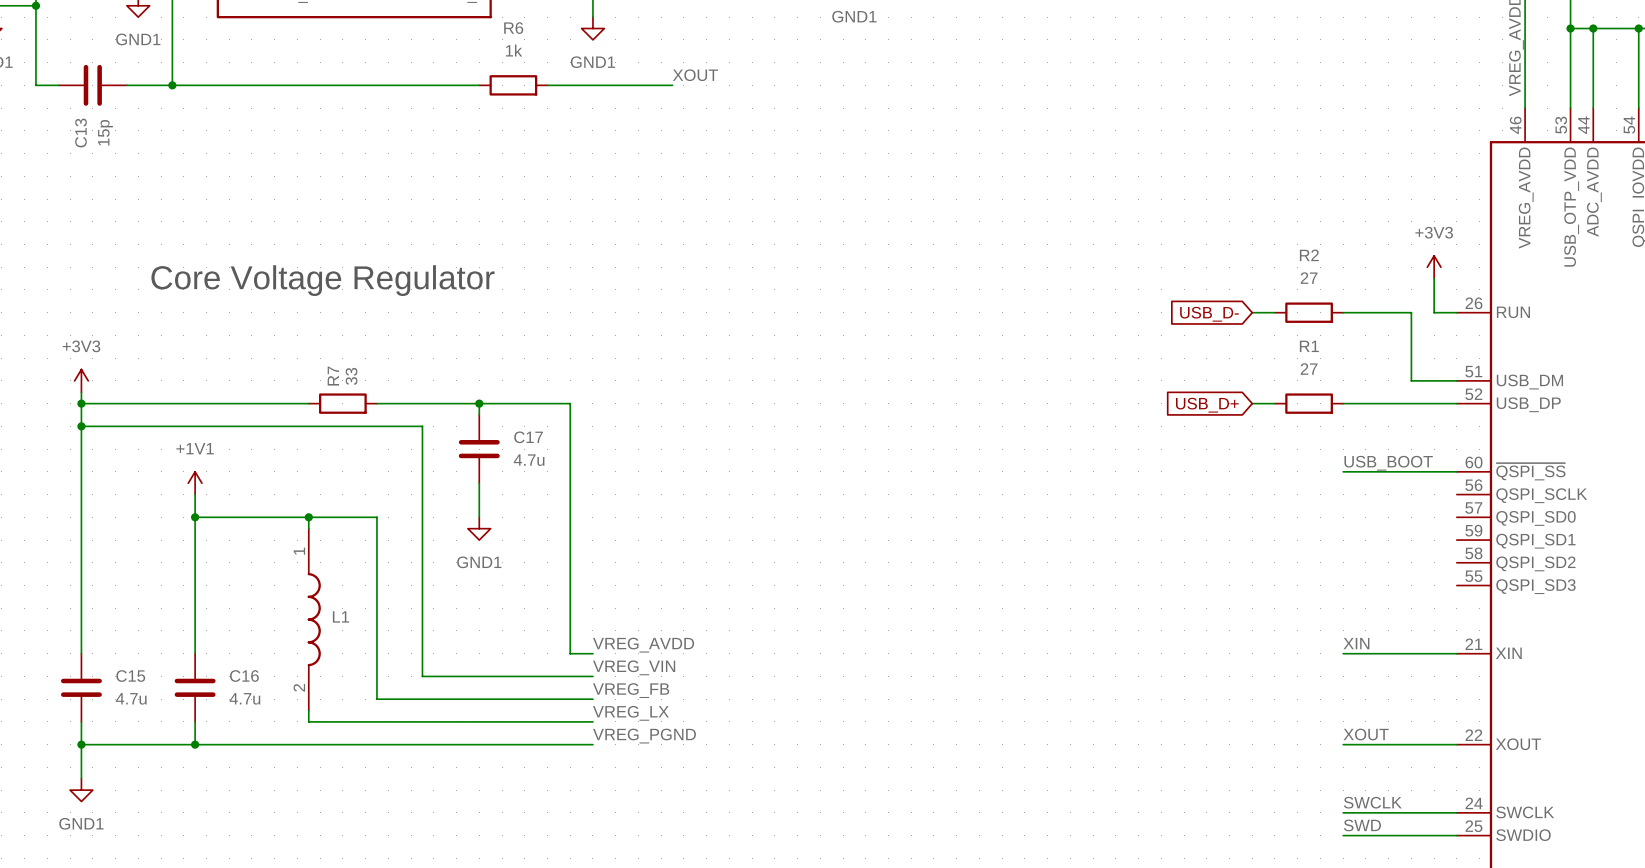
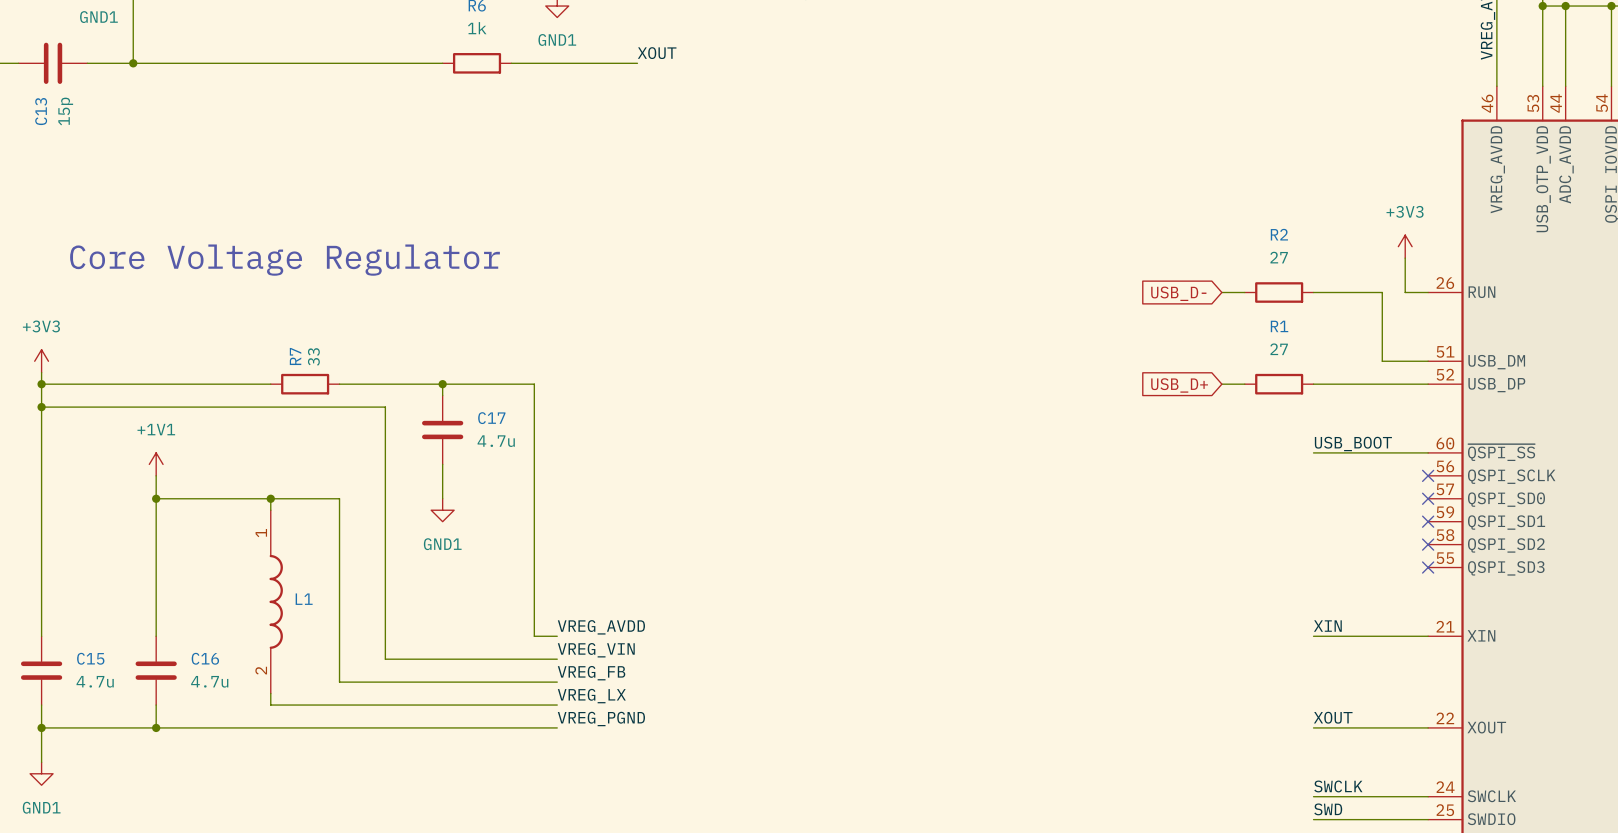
no-connect mark: none -> (1428, 475)
no-connect mark: none -> (1428, 498)
no-connect mark: none -> (1428, 521)
no-connect mark: none -> (1428, 544)
no-connect mark: none -> (1428, 567)

